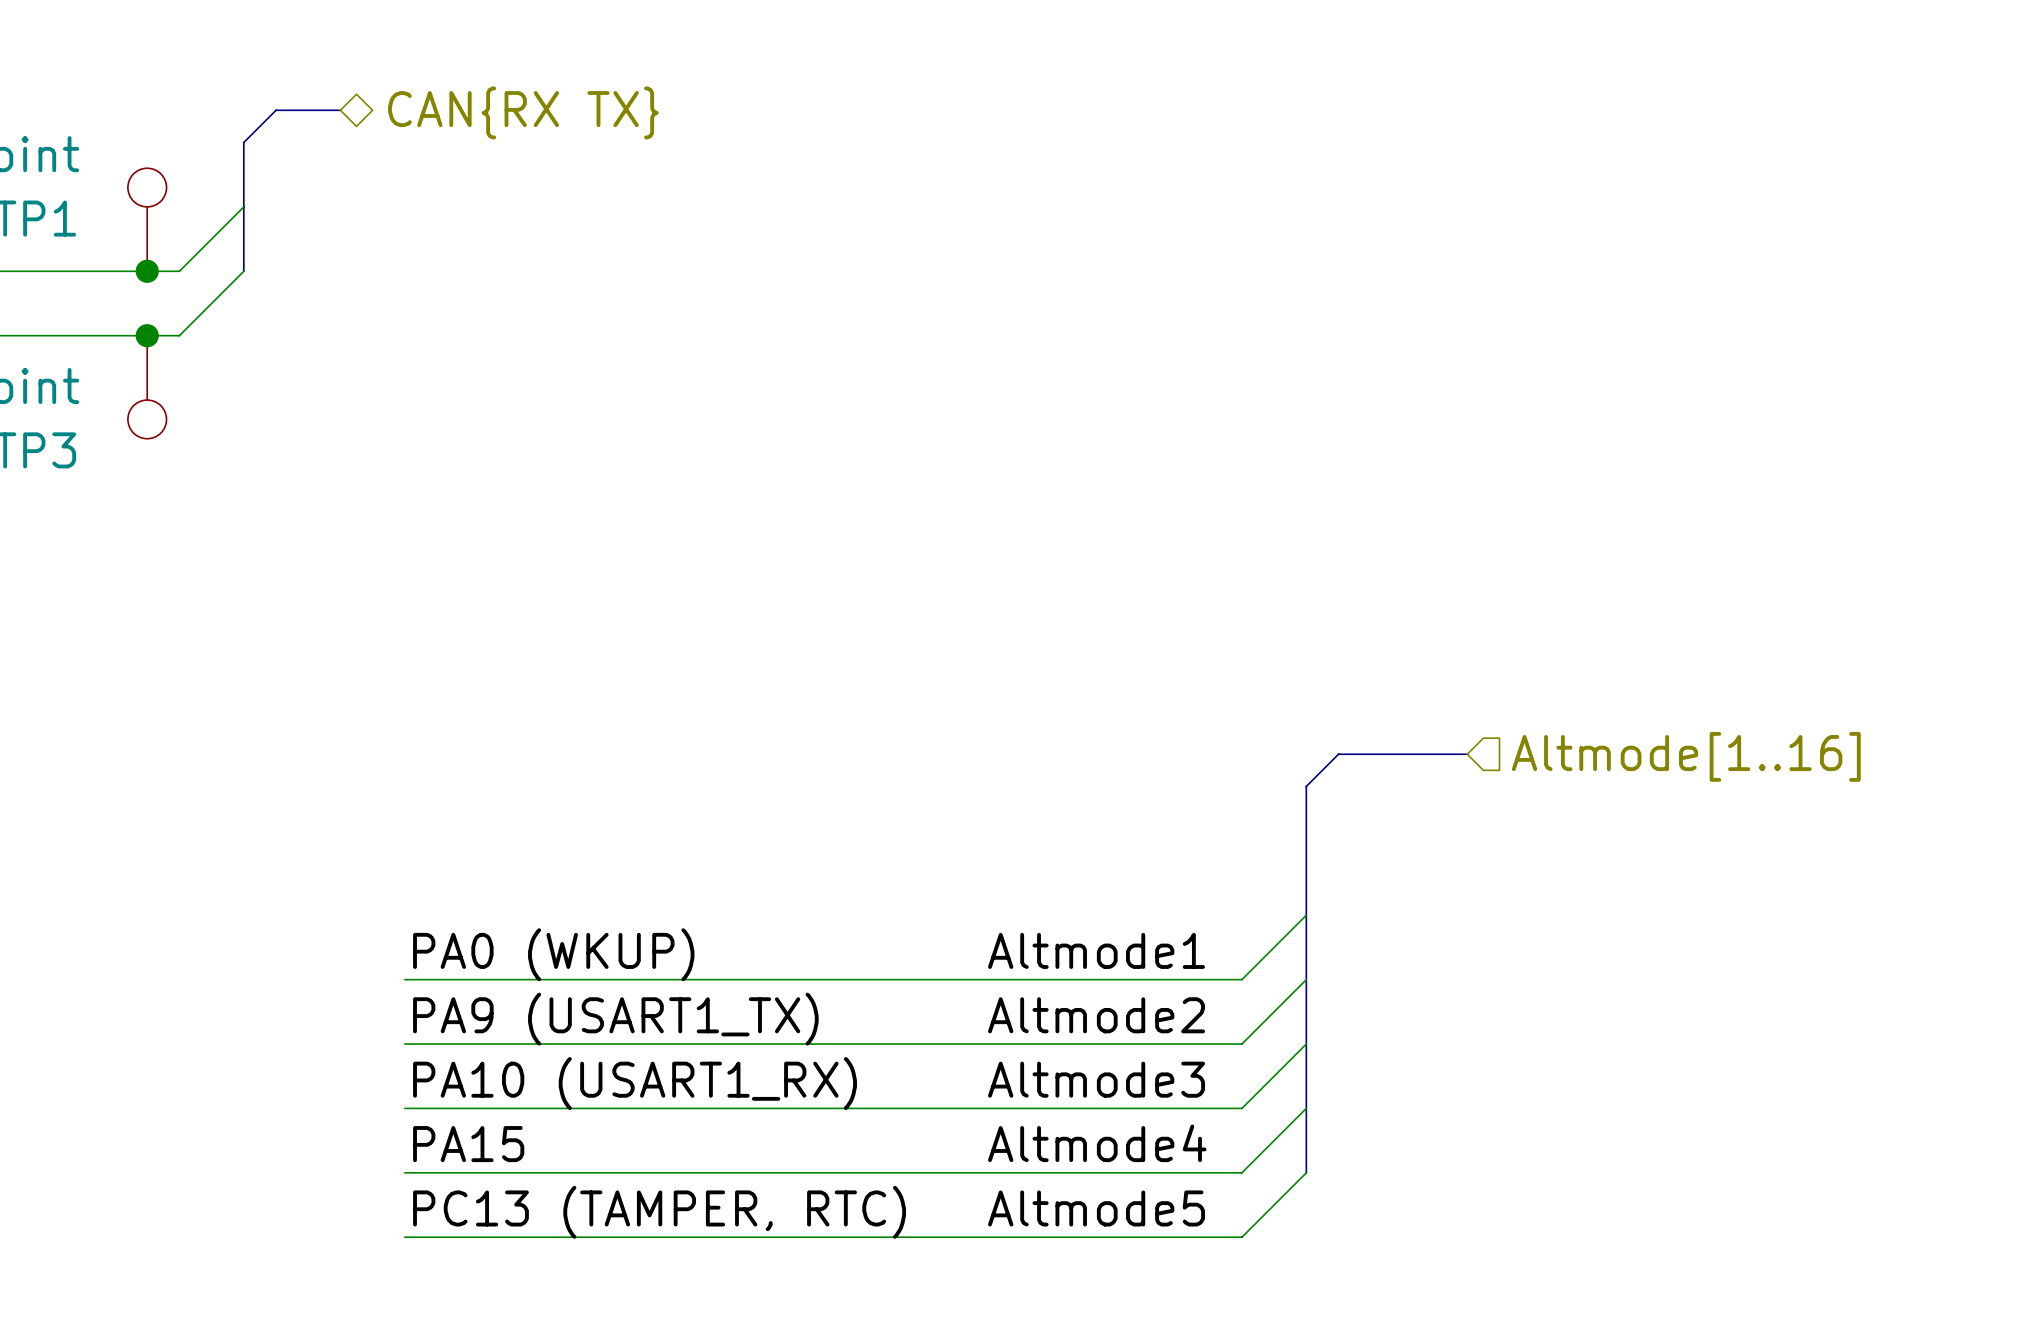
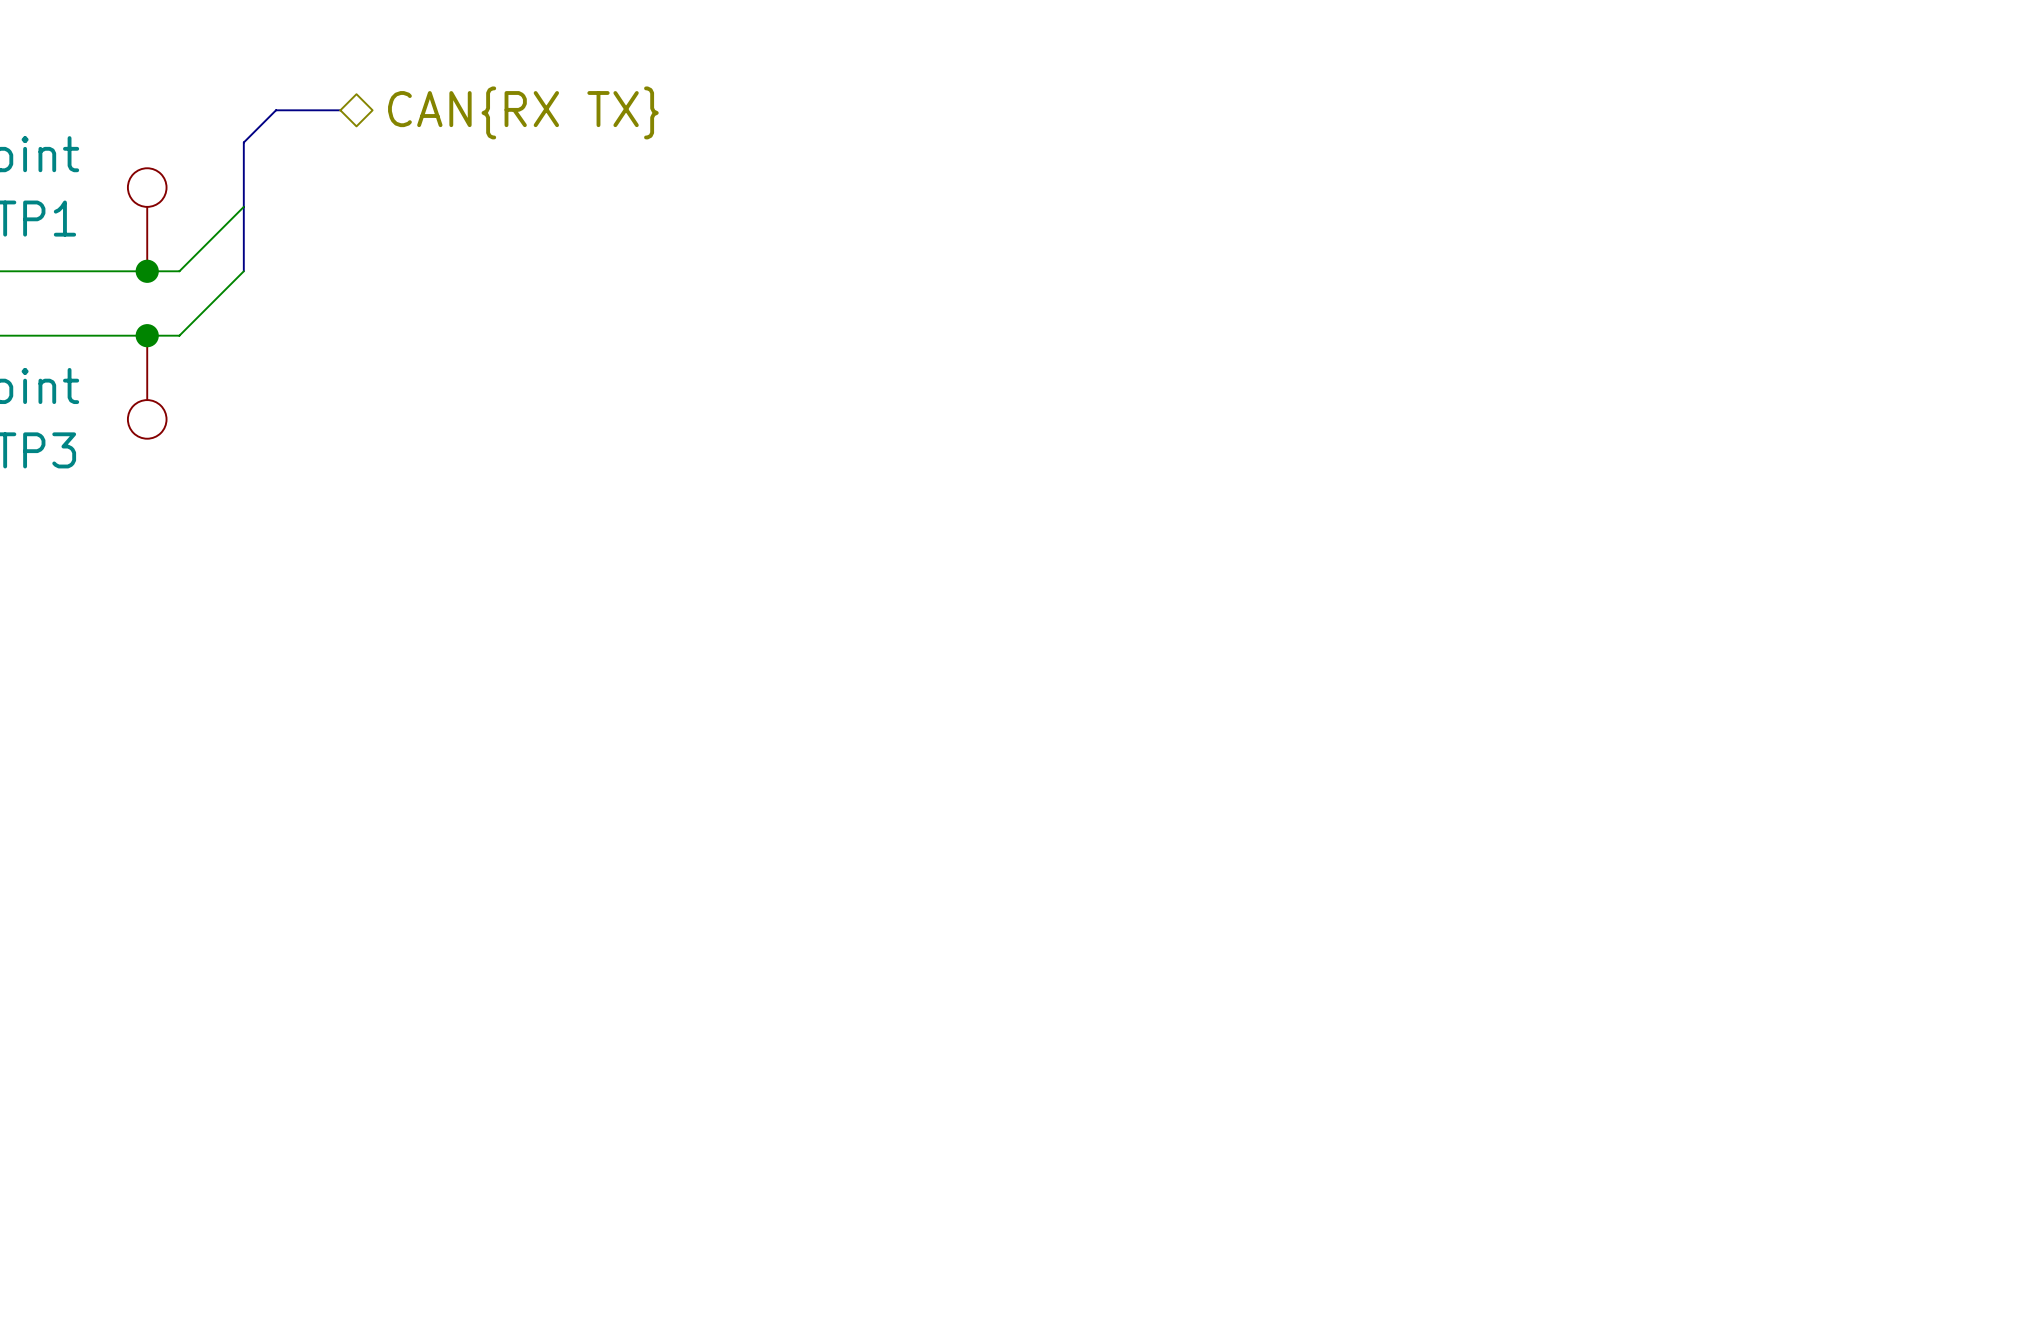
bus: (1467, 754) (1338, 754) (1306, 786) (1306, 1172) -> none
hierarchical label: Altmode[1..16] (1686, 756) -> none
wire: (1306, 915) (1241, 979) (404, 979) -> none
label: Altmode1 (1096, 950) -> none
label: PA0 (WKUP) (553, 954) -> none
wire: (1306, 979) (1241, 1044) (404, 1044) -> none
label: Altmode2 (1096, 1015) -> none
label: PA9 (USART1_TX) (615, 1019) -> none
wire: (1306, 1044) (1241, 1108) (404, 1108) -> none
label: Altmode3 (1096, 1079) -> none
label: PA10 (USART1_RX) (635, 1083) -> none
wire: (1306, 1108) (1241, 1172) (404, 1172) -> none
label: Altmode4 (1097, 1143) -> none
label: PA15 (468, 1144) -> none
wire: (1306, 1172) (1241, 1237) (404, 1237) -> none
label: Altmode5 (1096, 1208) -> none
label: PC13 (TAMPER, RTC) (659, 1212) -> none

